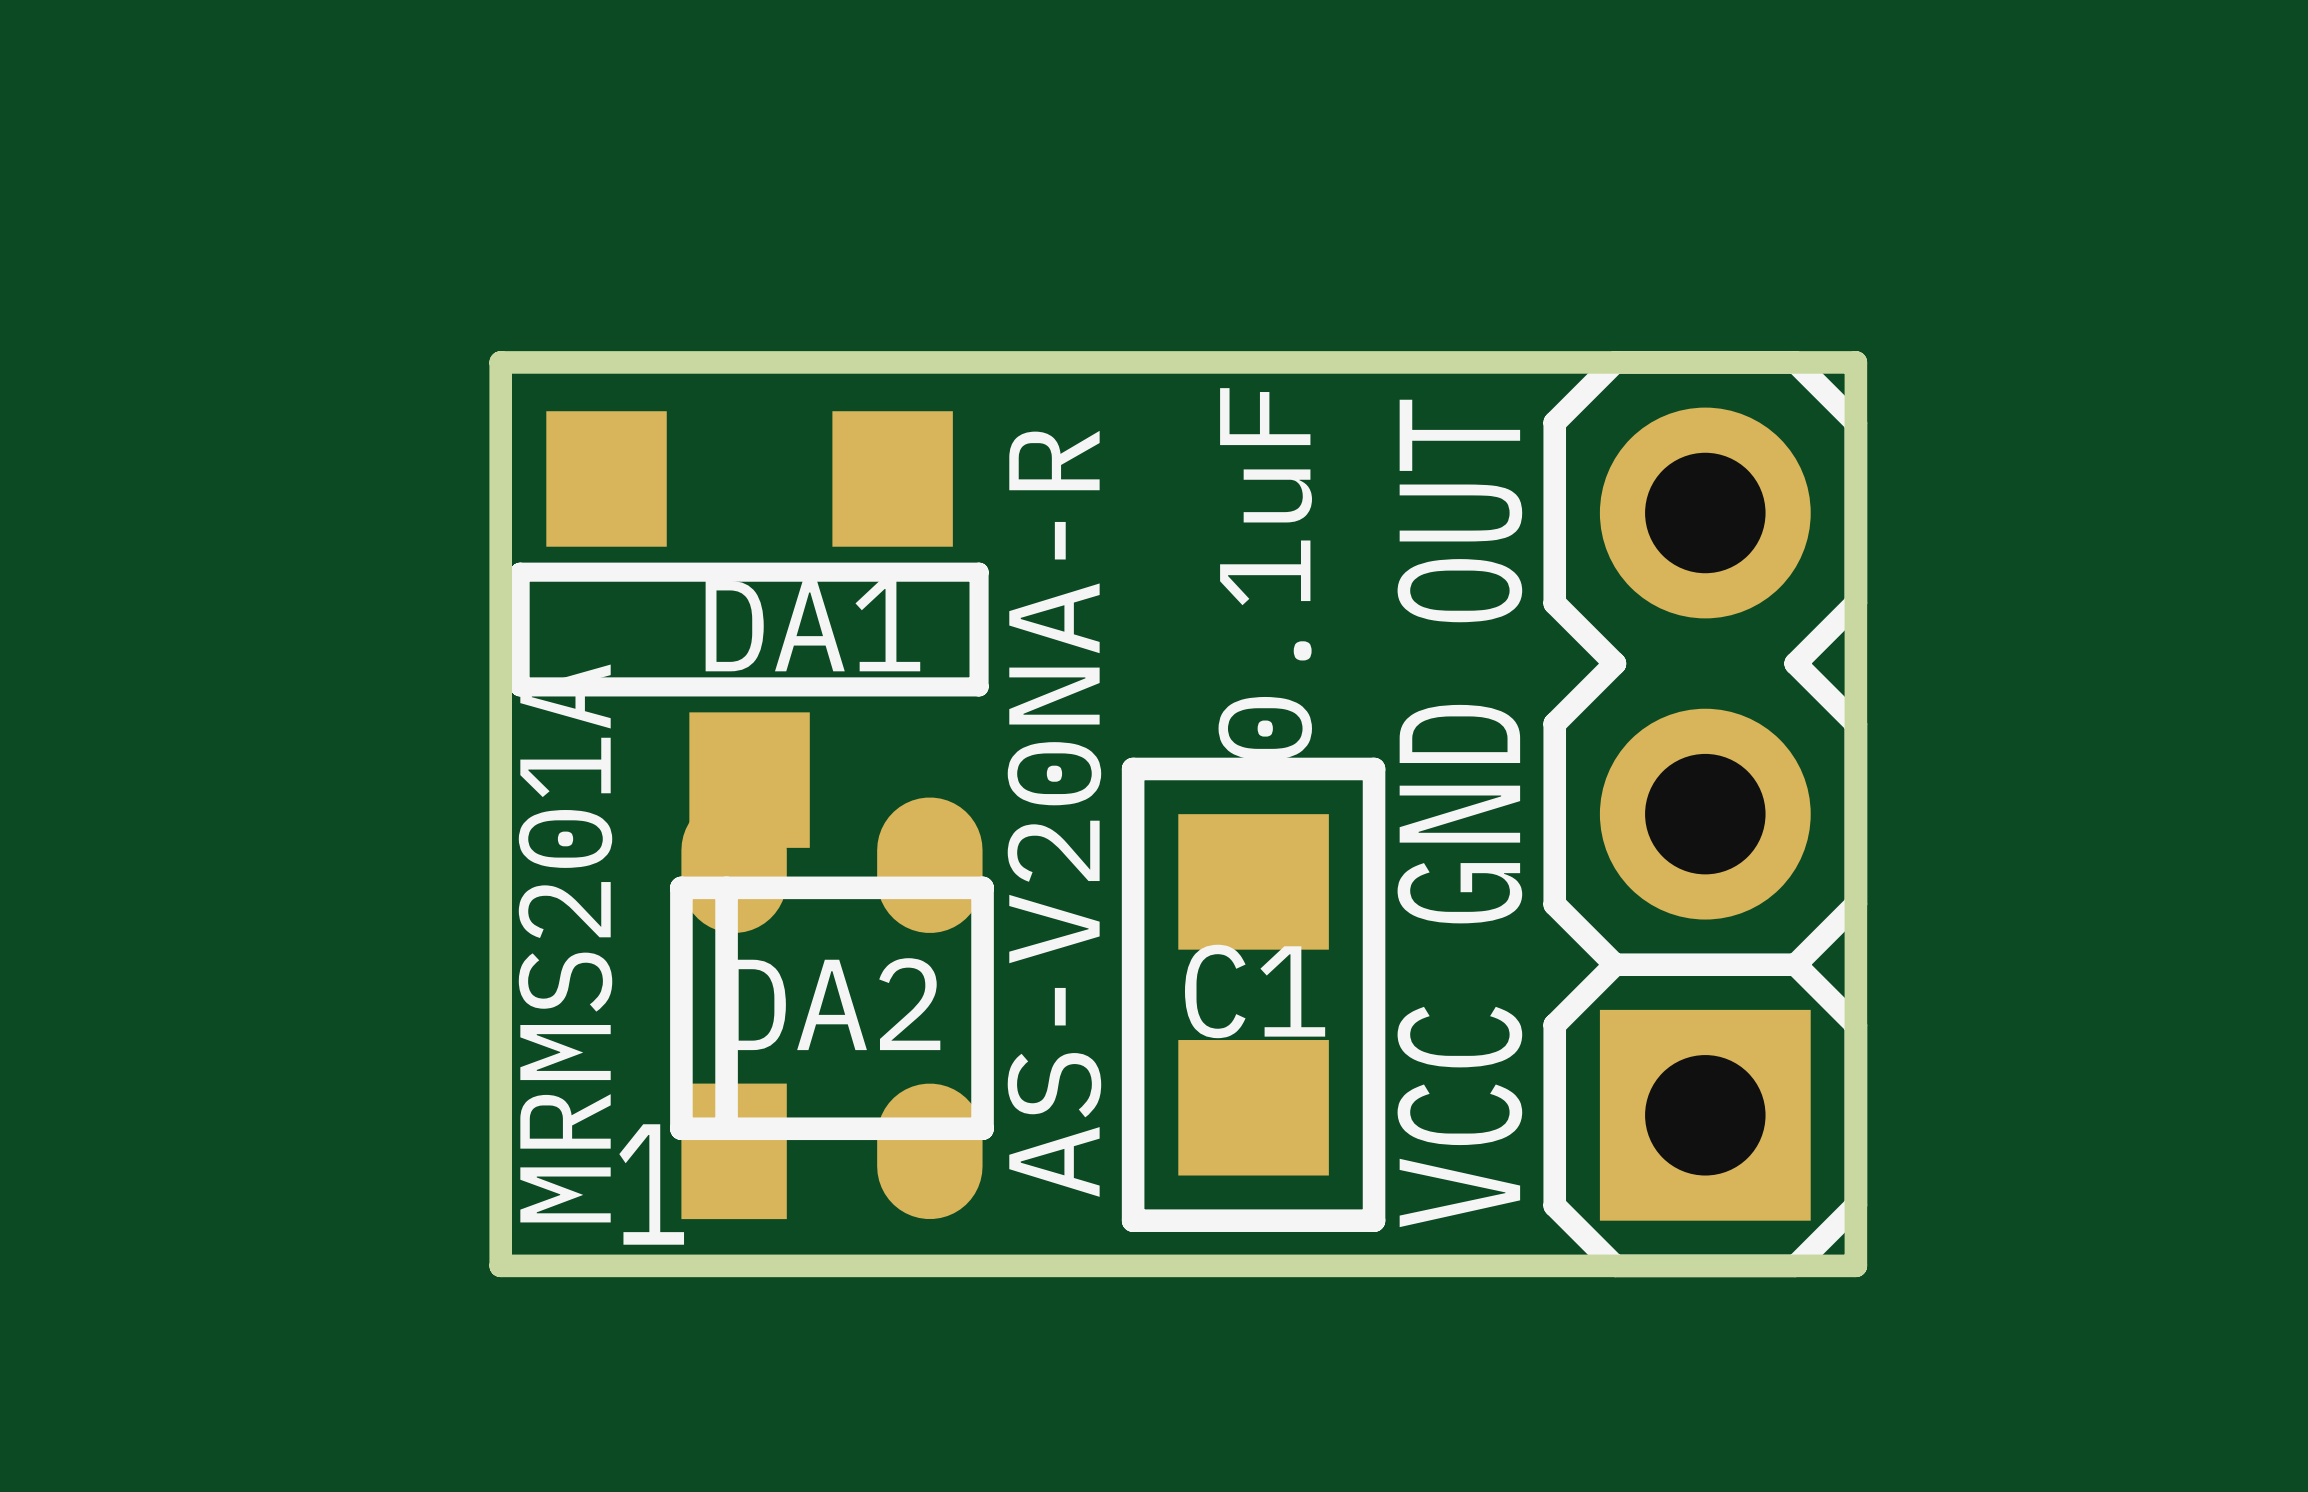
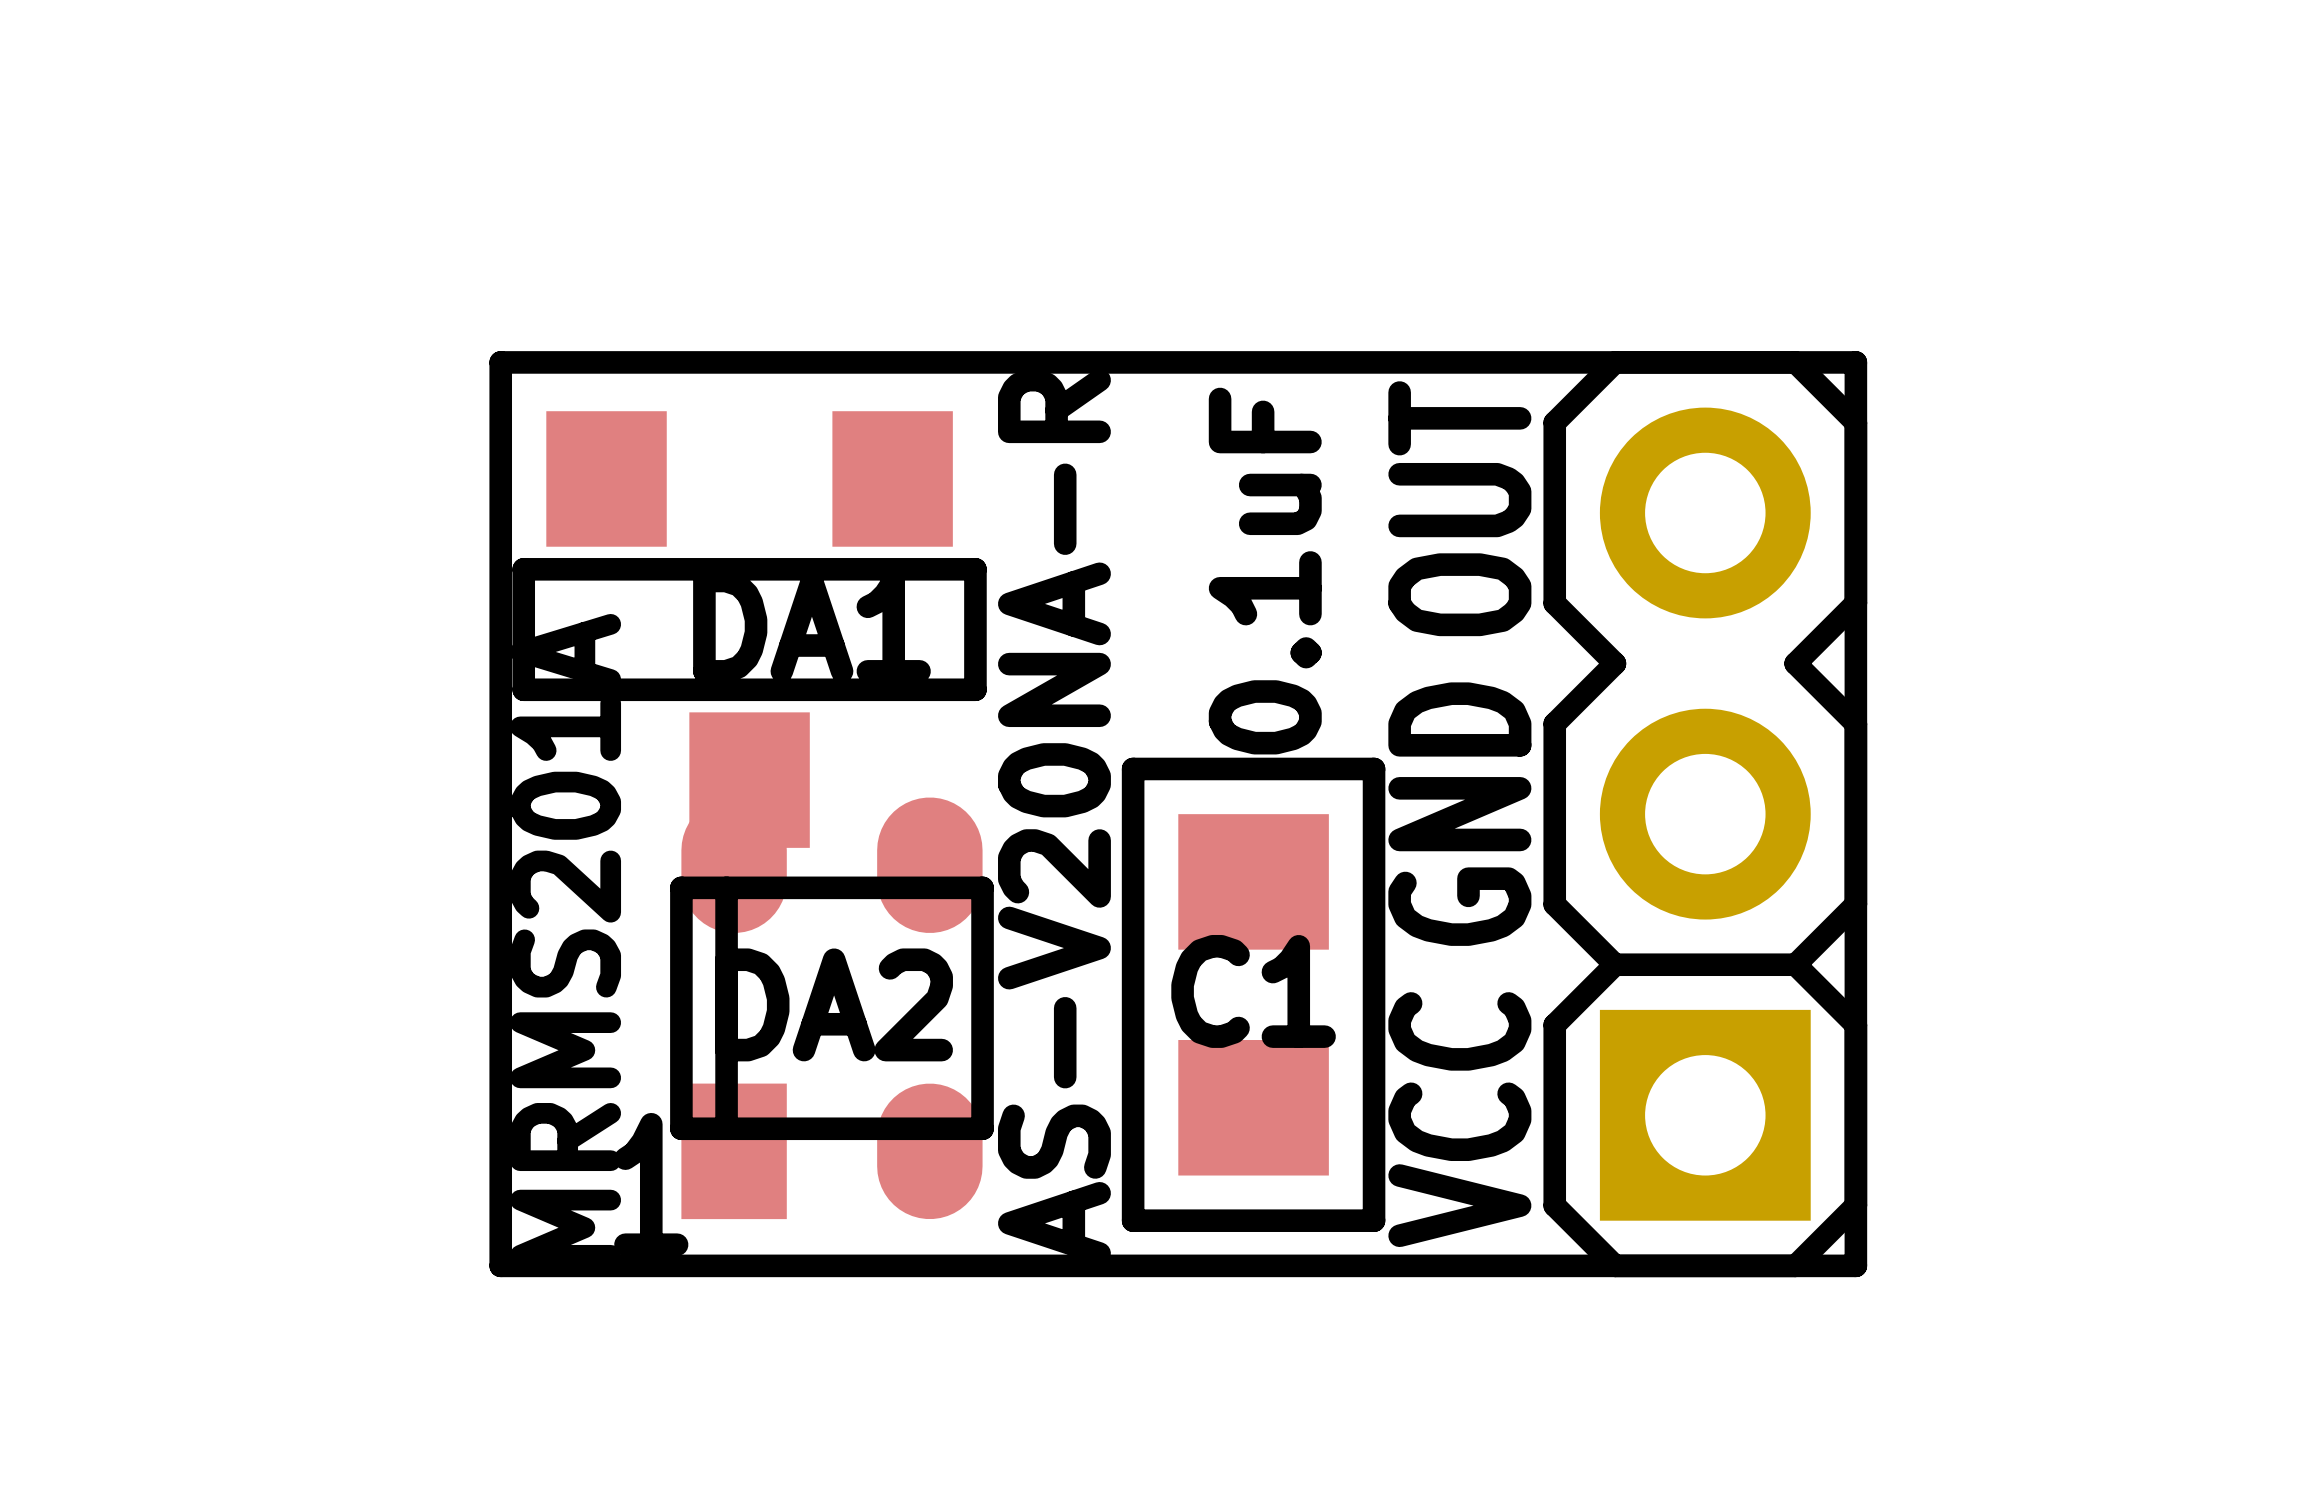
DA1 footprint: [510, 411, 989, 848] -> [512, 411, 987, 848]

